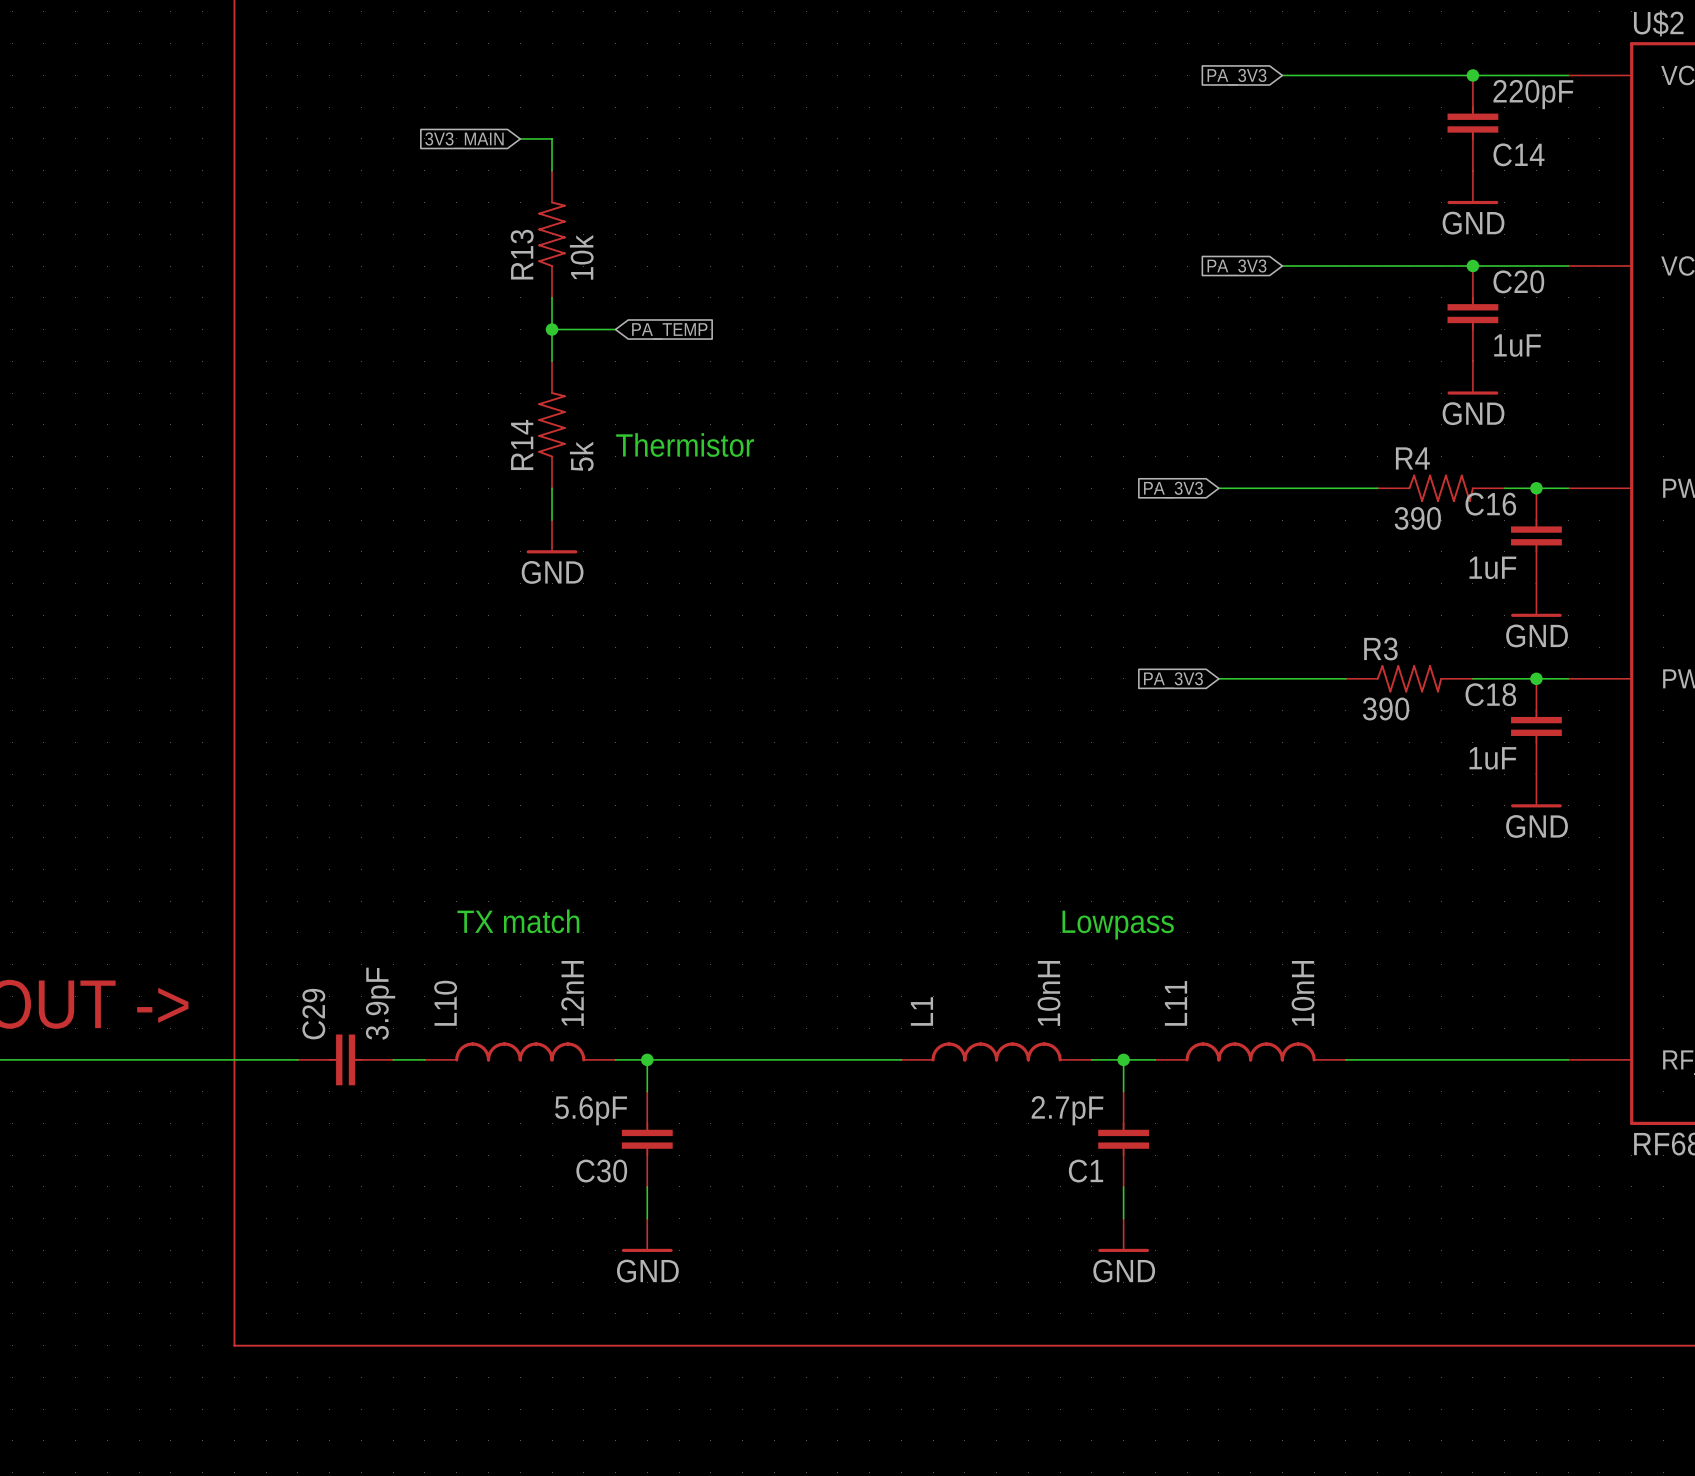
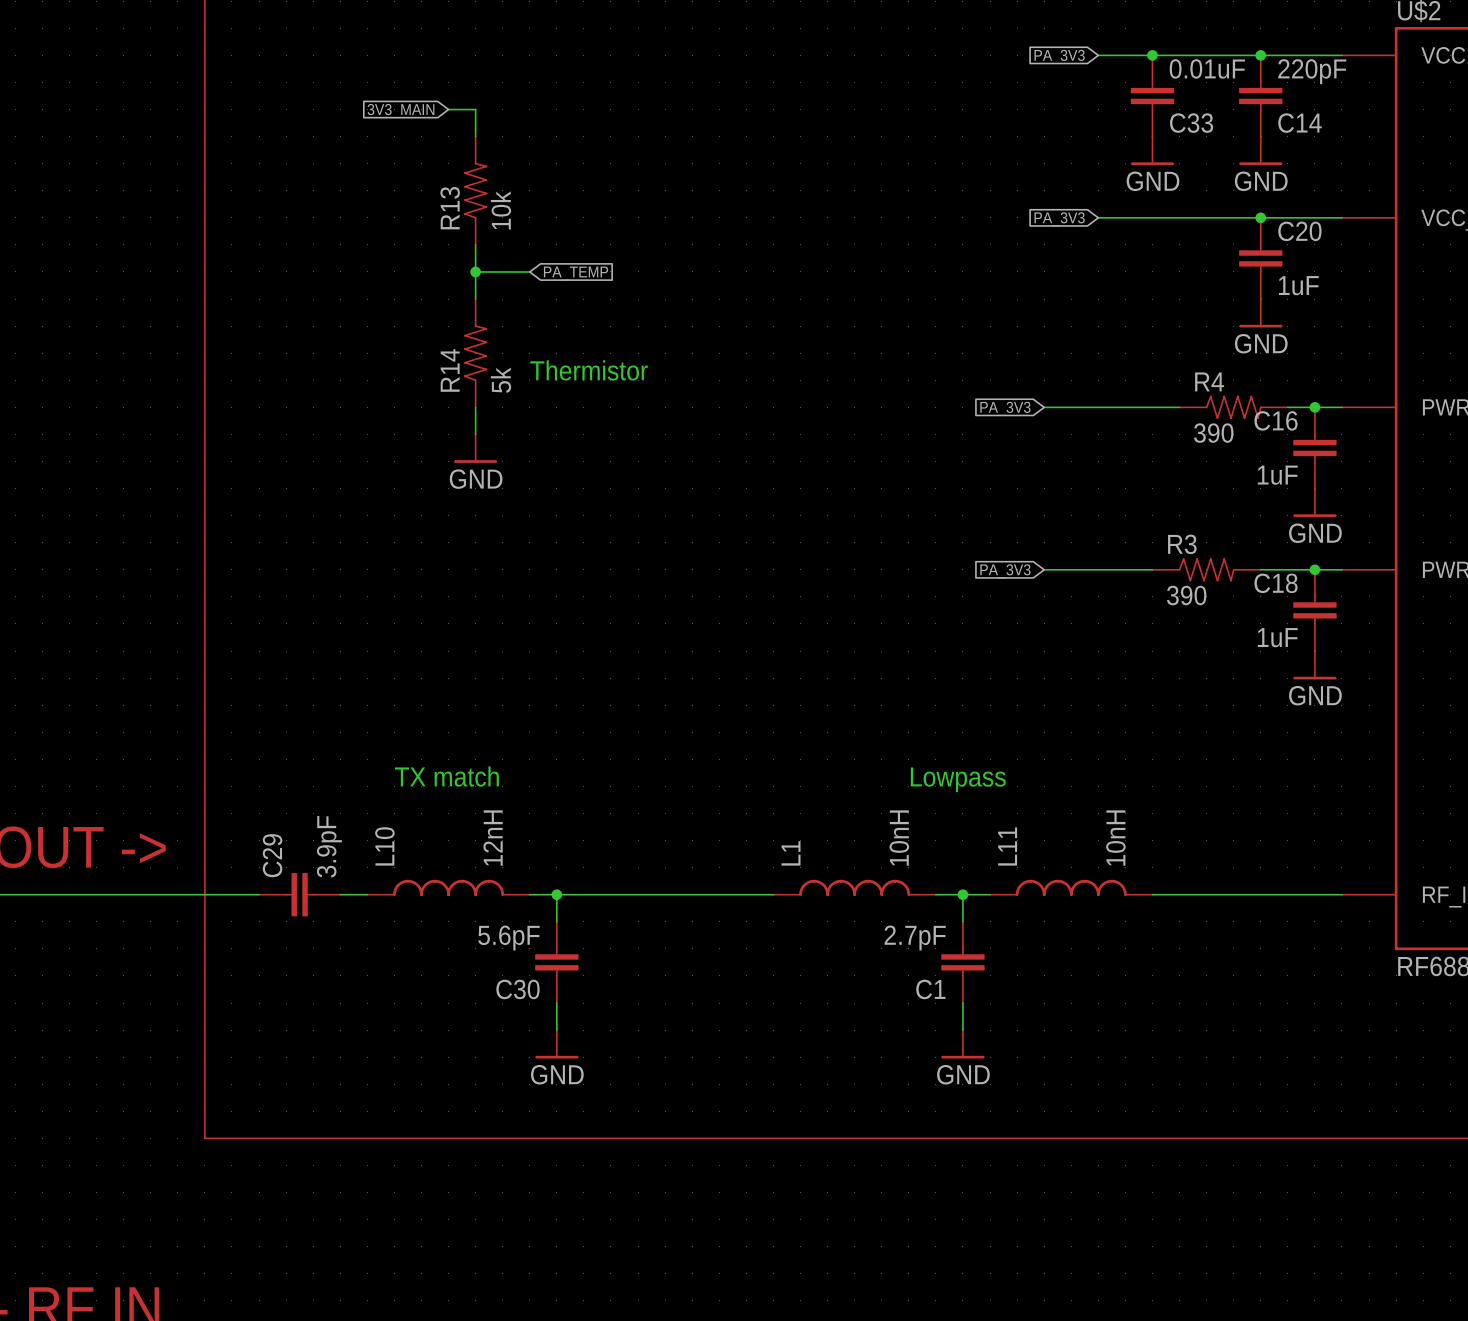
junction: none -> (1152, 55)
C33: none -> 0.01uF (1152, 96)
power symbol: none -> GND (1152, 150)

